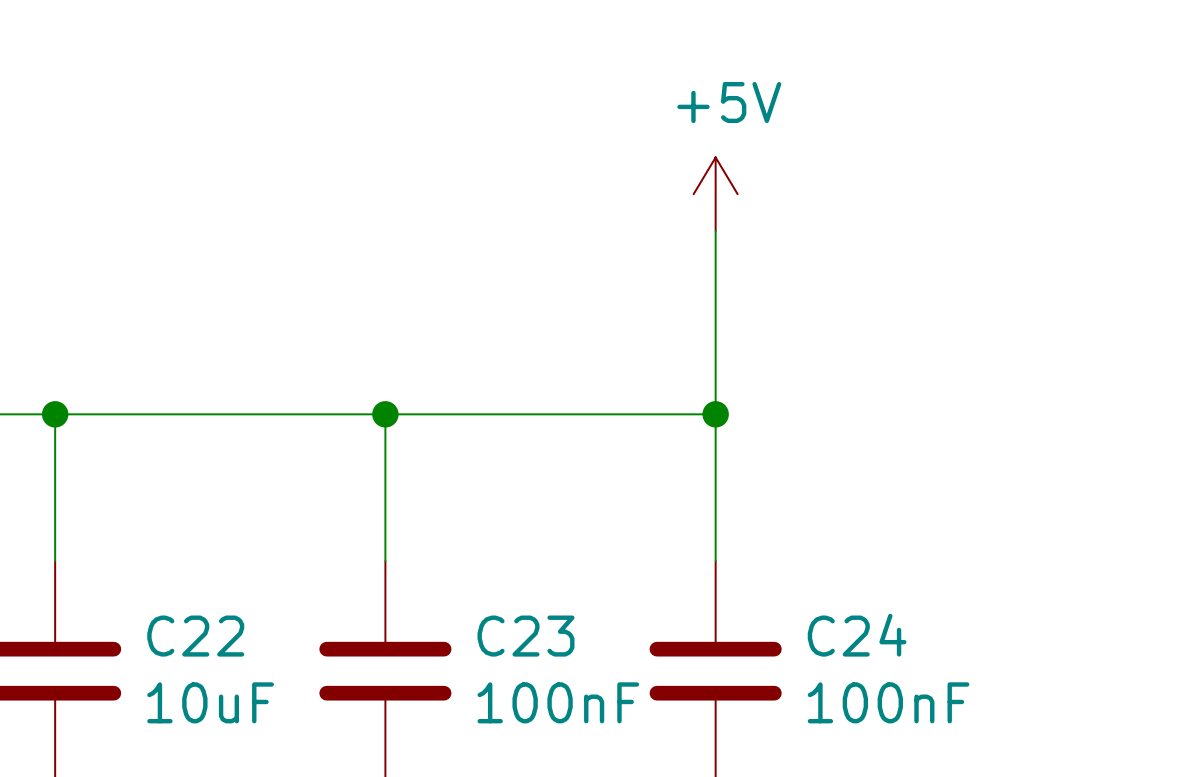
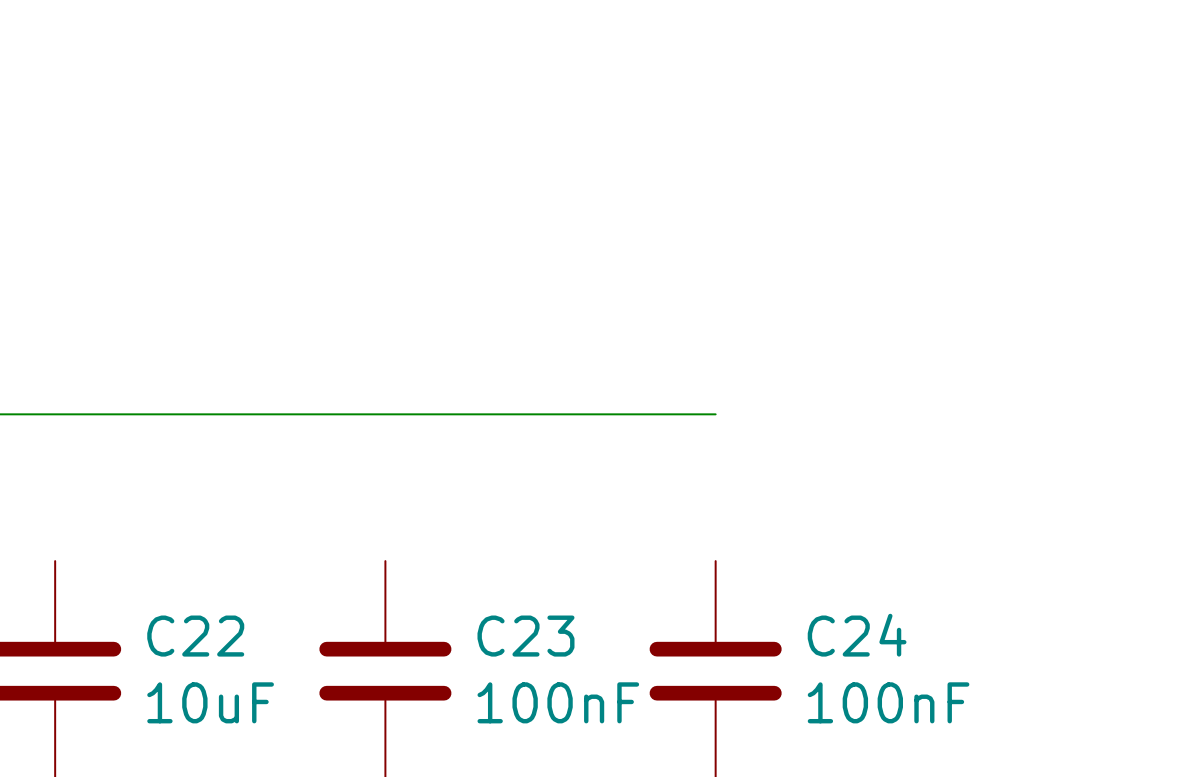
power symbol: +5V (715, 194) -> none
wire: (715, 230) (715, 561) -> none
wire: (55, 414) (55, 561) -> none
junction: (55, 414) -> none
wire: (385, 414) (385, 561) -> none
junction: (385, 414) -> none
junction: (715, 414) -> none

